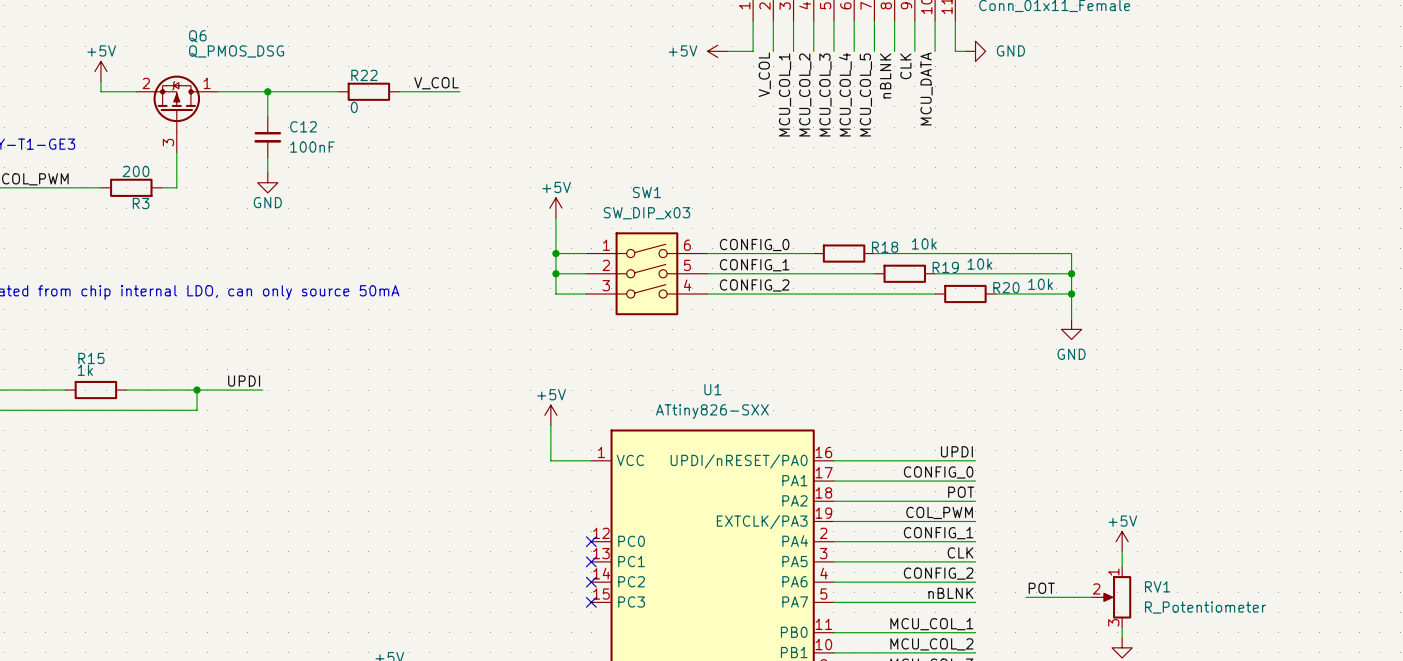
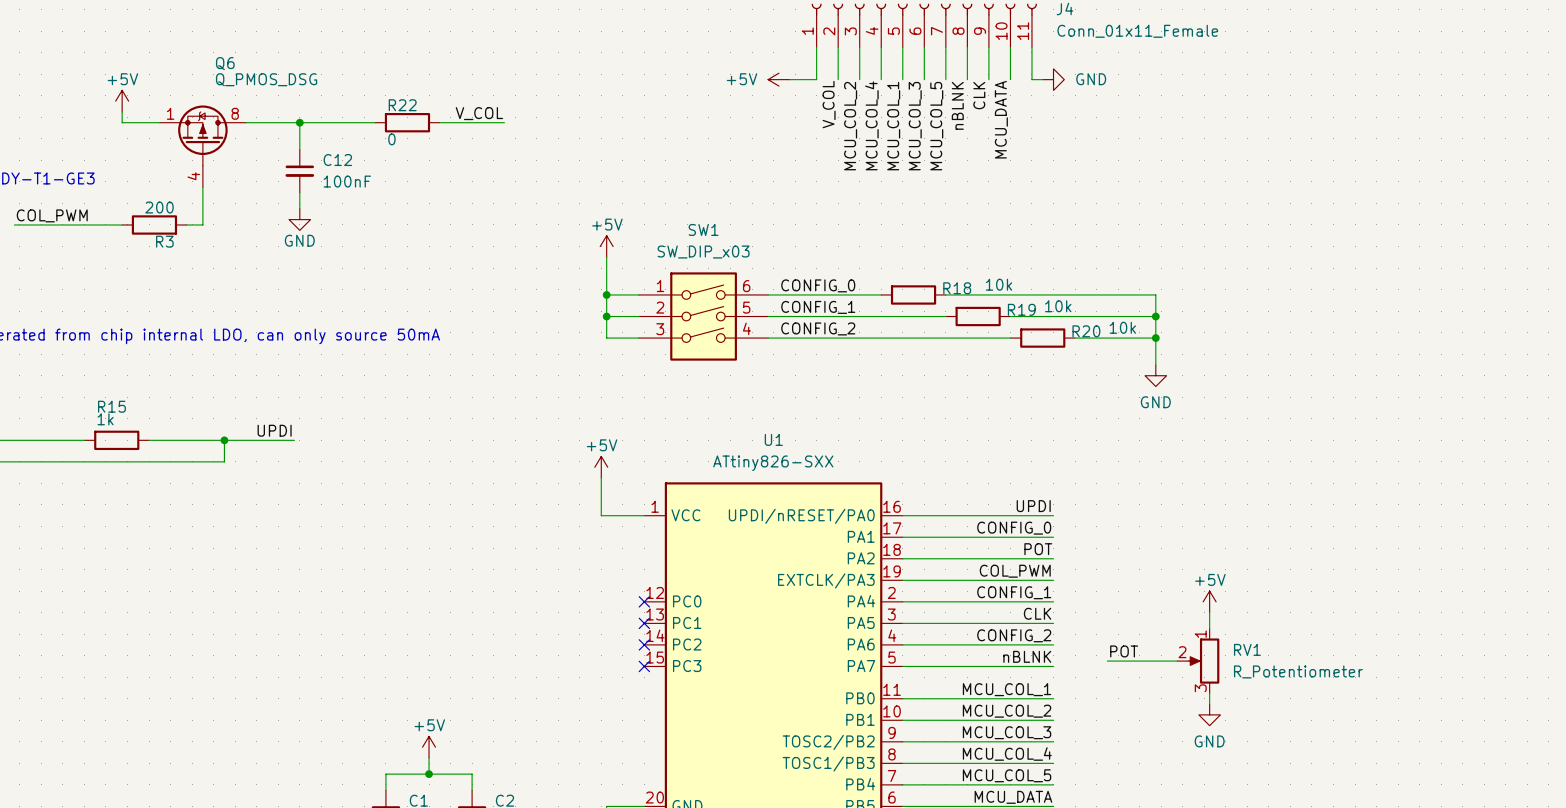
Q6 pin number: 2 (146, 83) -> 1 (170, 113)
Q6 pin number: 1 (207, 83) -> 8 (235, 113)
label: MCU_COL_1 (784, 94) -> MCU_COL_2 (850, 126)
label: MCU_COL_2 (805, 94) -> MCU_COL_4 (871, 125)
label: MCU_COL_3 (825, 94) -> MCU_COL_1 (893, 126)
label: MCU_COL_4 (845, 94) -> MCU_COL_3 (915, 126)
Q6 pin number: 3 (168, 142) -> 4 (193, 176)

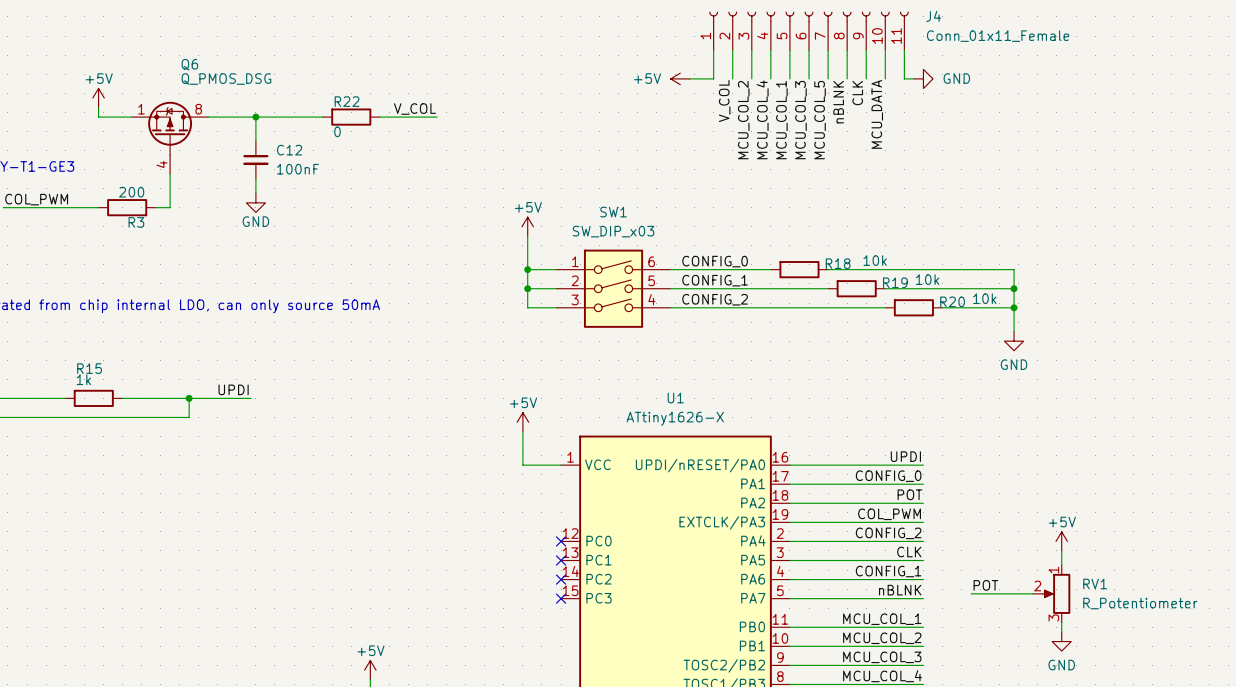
U1 value: ATtiny826-SXX (773, 463) -> ATtiny1626-X (675, 418)
label: CONFIG_1 (1014, 592) -> CONFIG_2 (888, 533)
label: CONFIG_2 (1014, 635) -> CONFIG_1 (888, 571)

